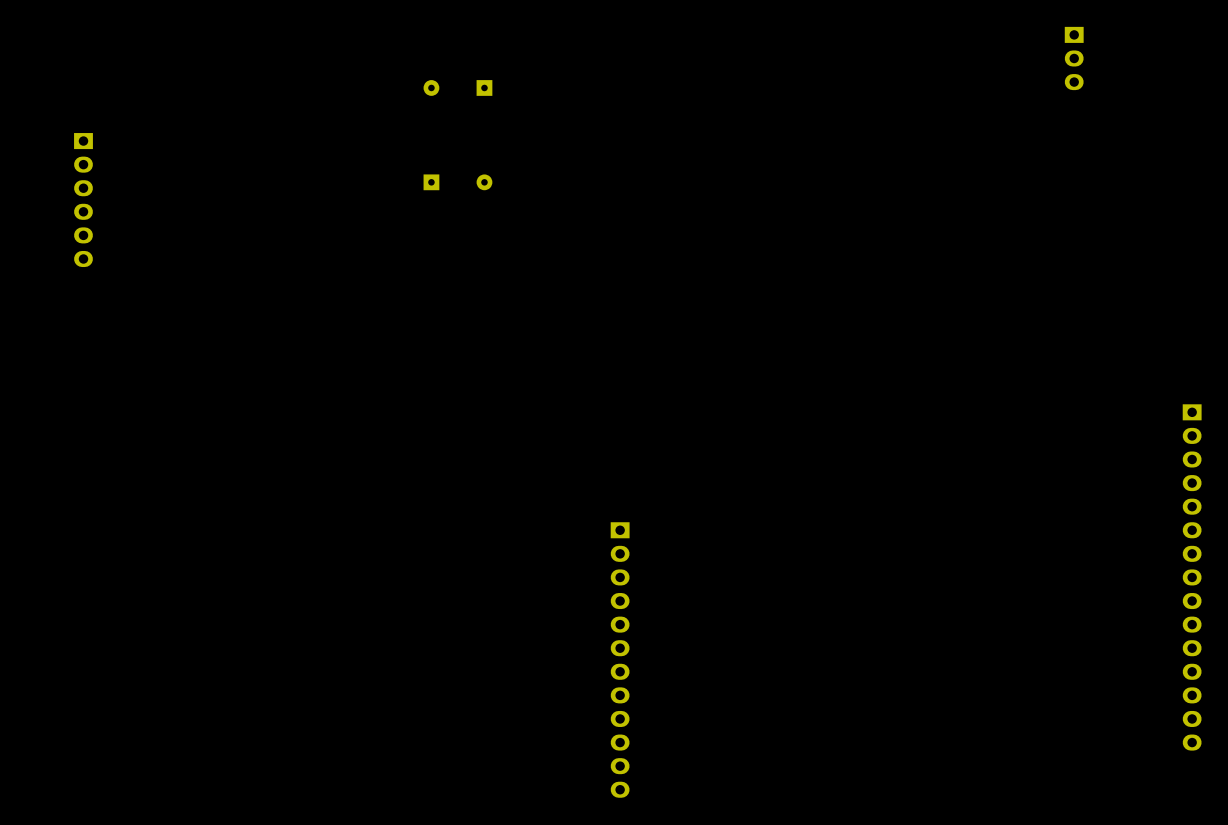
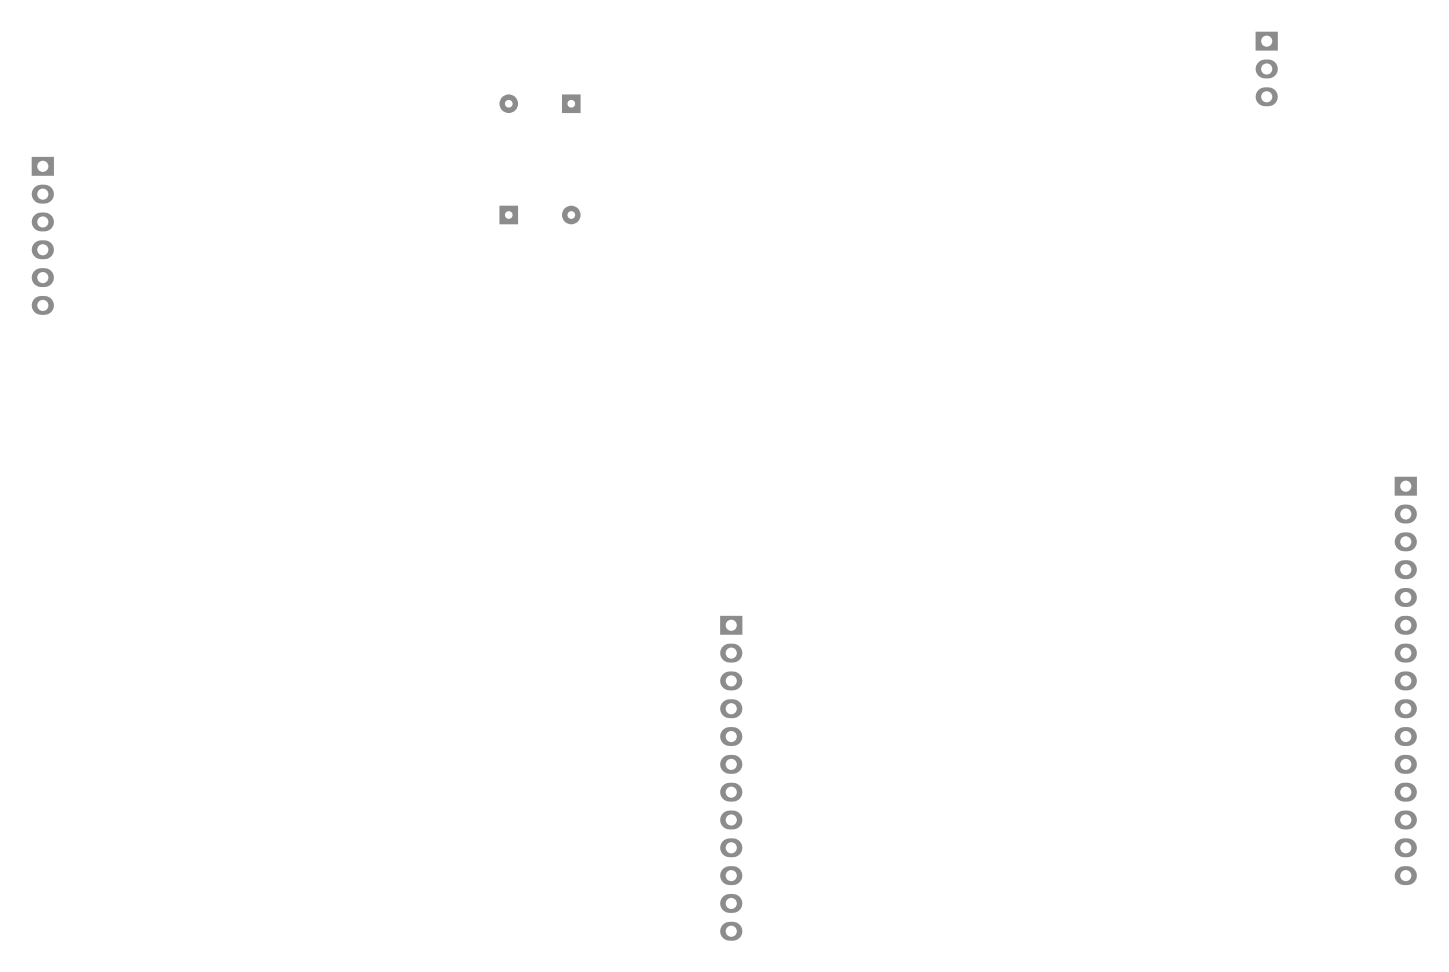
part position: (83, 200) -> (42, 235)

